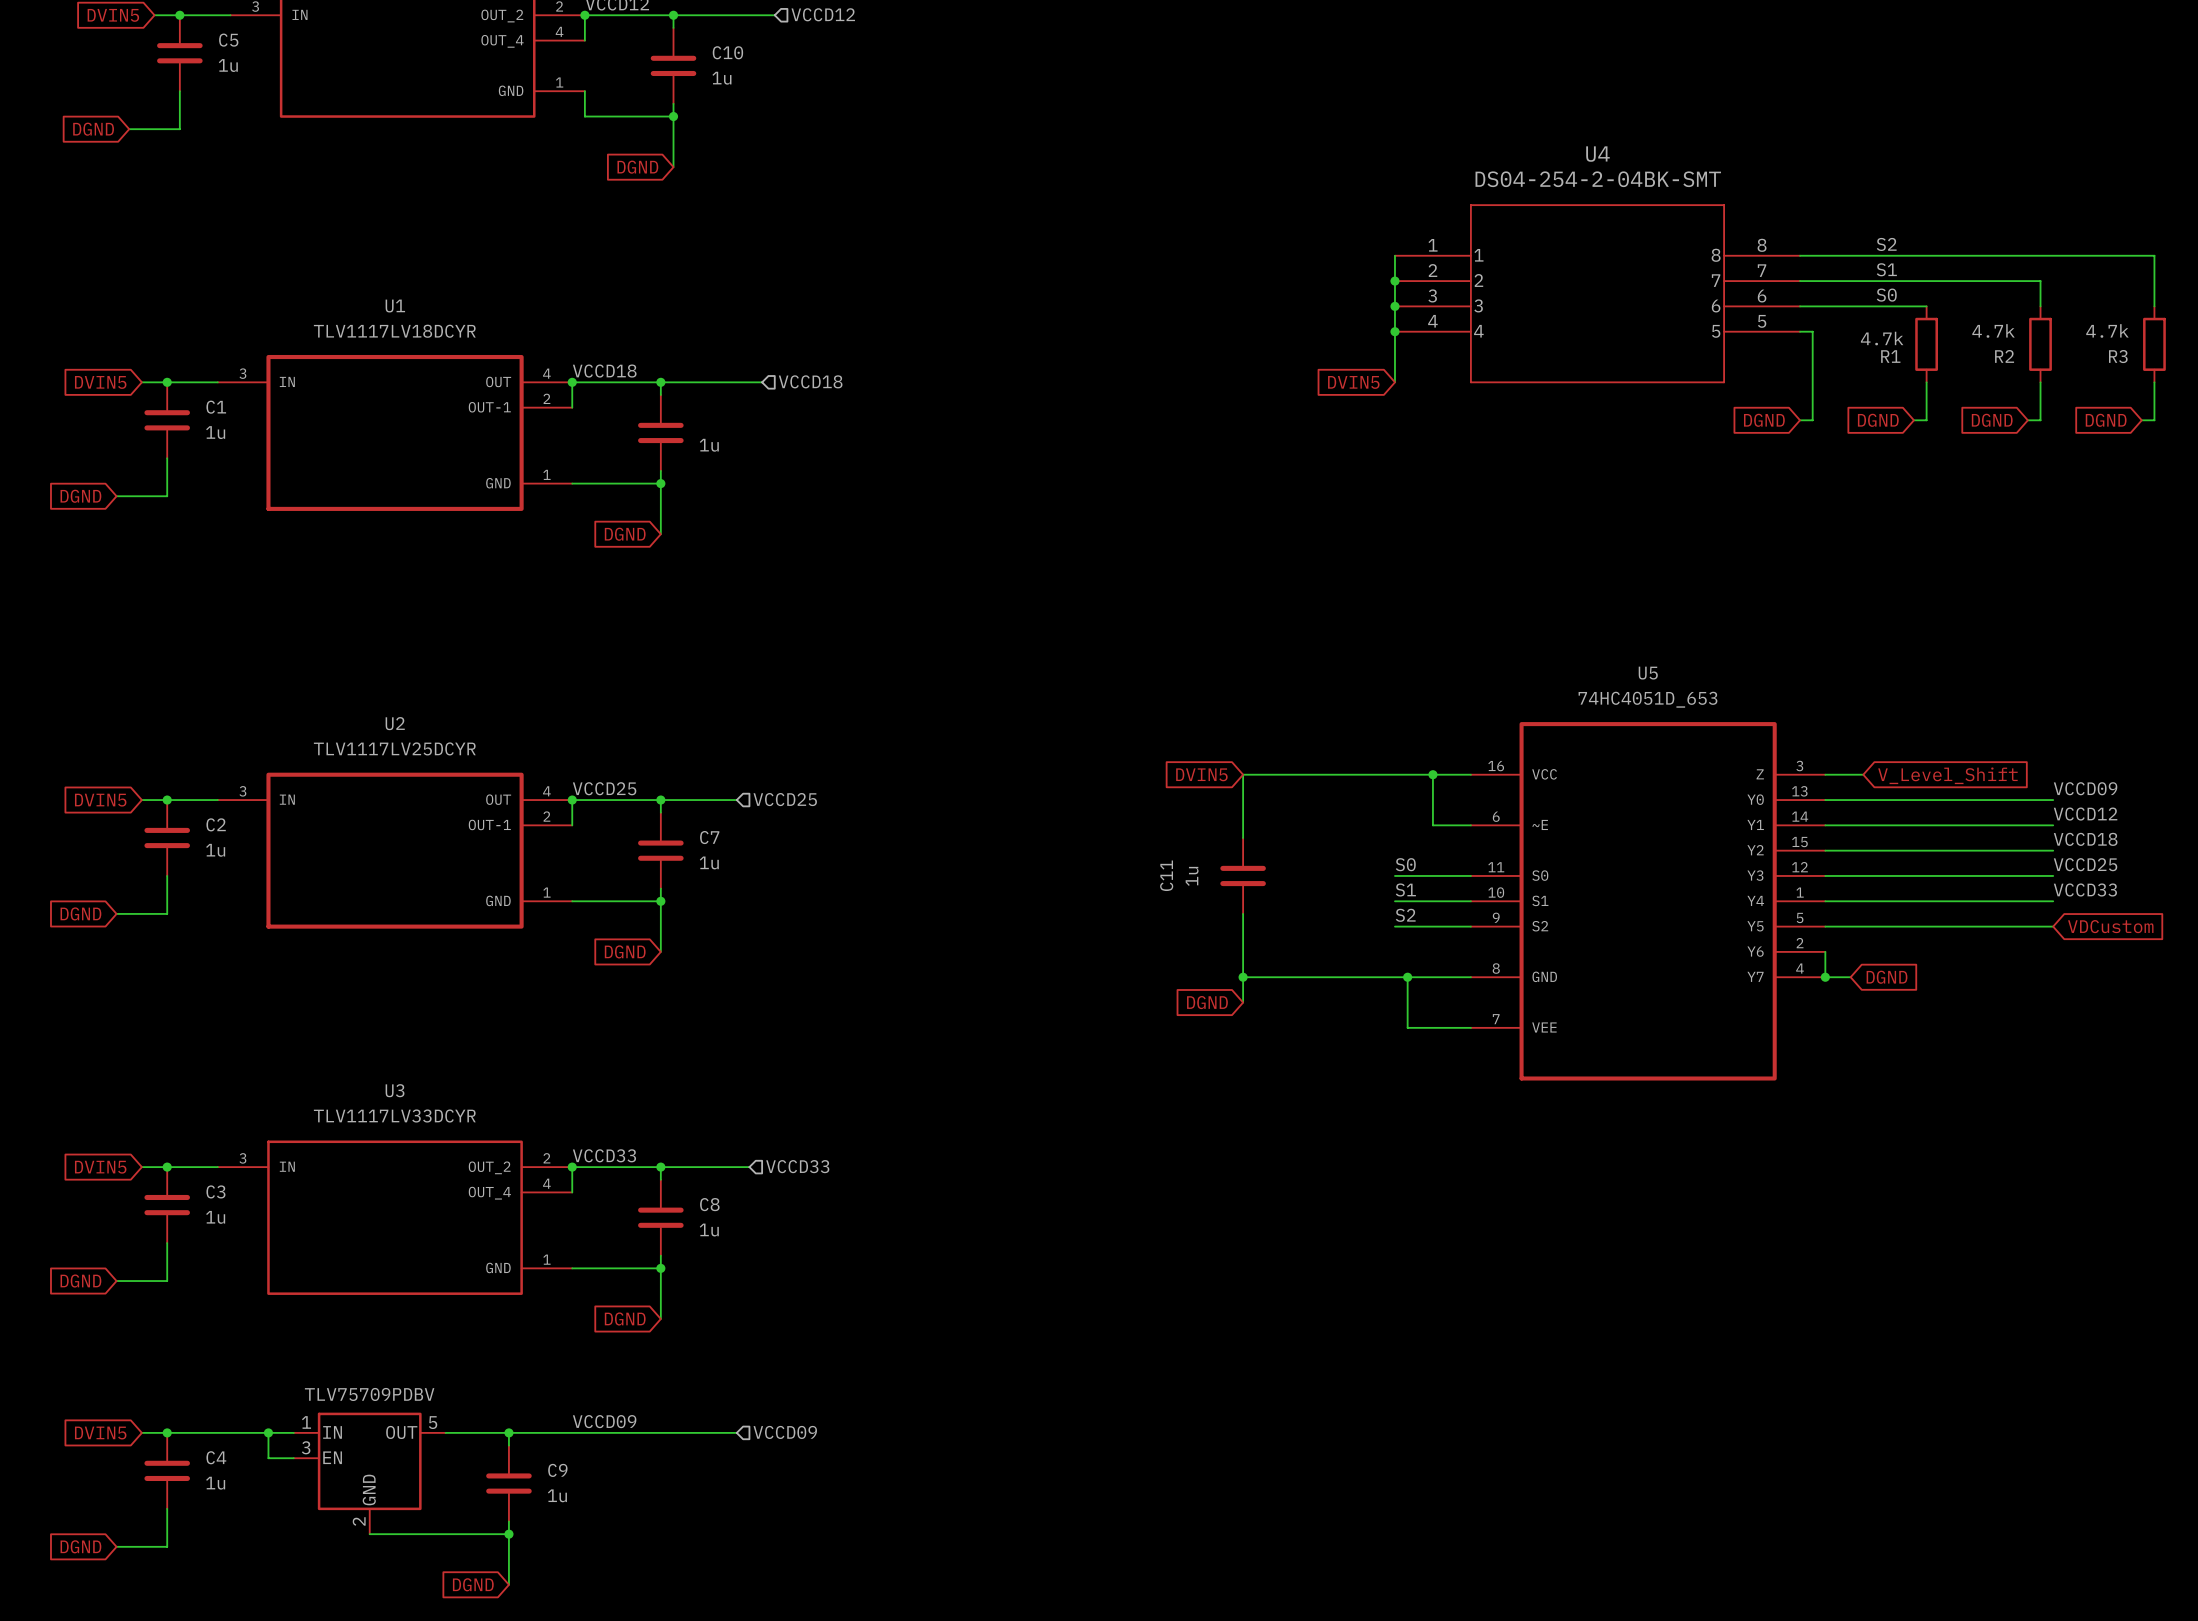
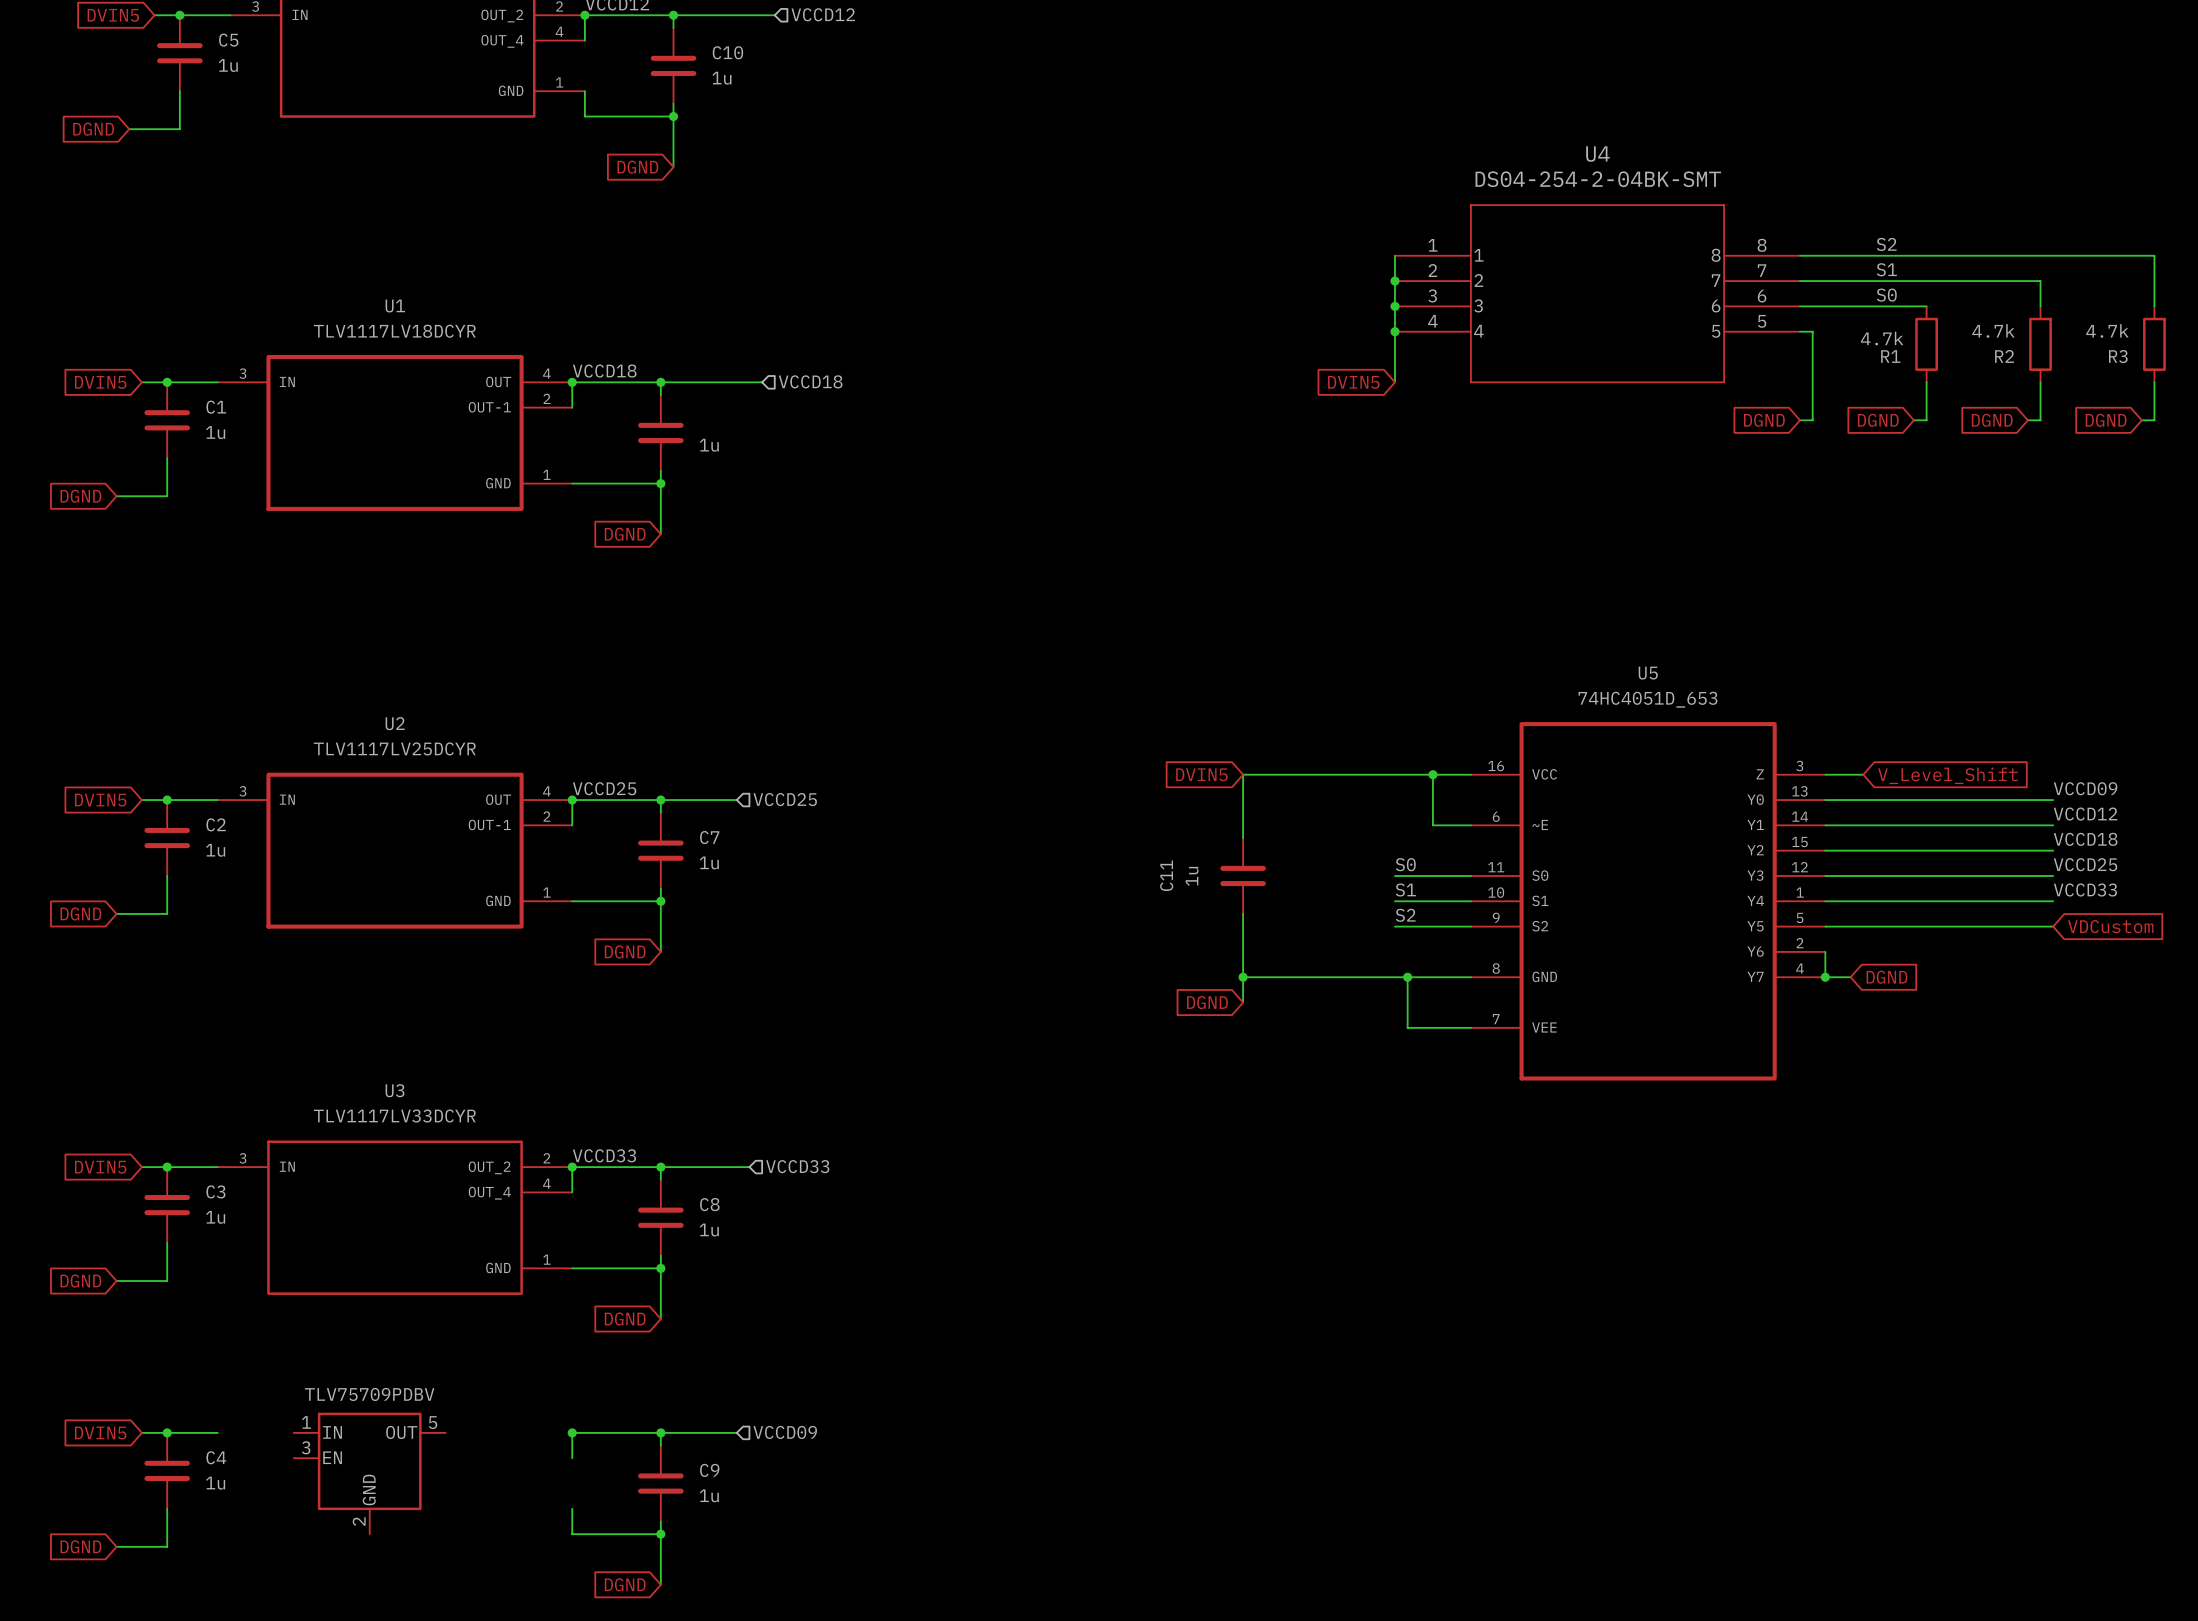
label: VCCD09 (604, 1421) -> none
wire: (217, 1432) (293, 1432) -> none
wire: (268, 1432) (268, 1458) (293, 1458) -> none
junction: (268, 1432) -> none
wire: (445, 1432) (572, 1432) -> (572, 1458) (572, 1432)
wire: (508, 1432) (508, 1445) -> (660, 1432) (660, 1445)
junction: (508, 1432) -> none
junction: none -> (572, 1432)
junction: none -> (660, 1432)
C9 position: (508, 1483) -> (660, 1483)
wire: none -> (572, 1508) (572, 1534) (660, 1534)
wire: (508, 1521) (508, 1584) -> (660, 1521) (660, 1584)
wire: (369, 1534) (508, 1534) -> none
junction: (508, 1534) -> none
junction: none -> (660, 1534)
global label position: DGND (473, 1584) -> DGND (625, 1584)

